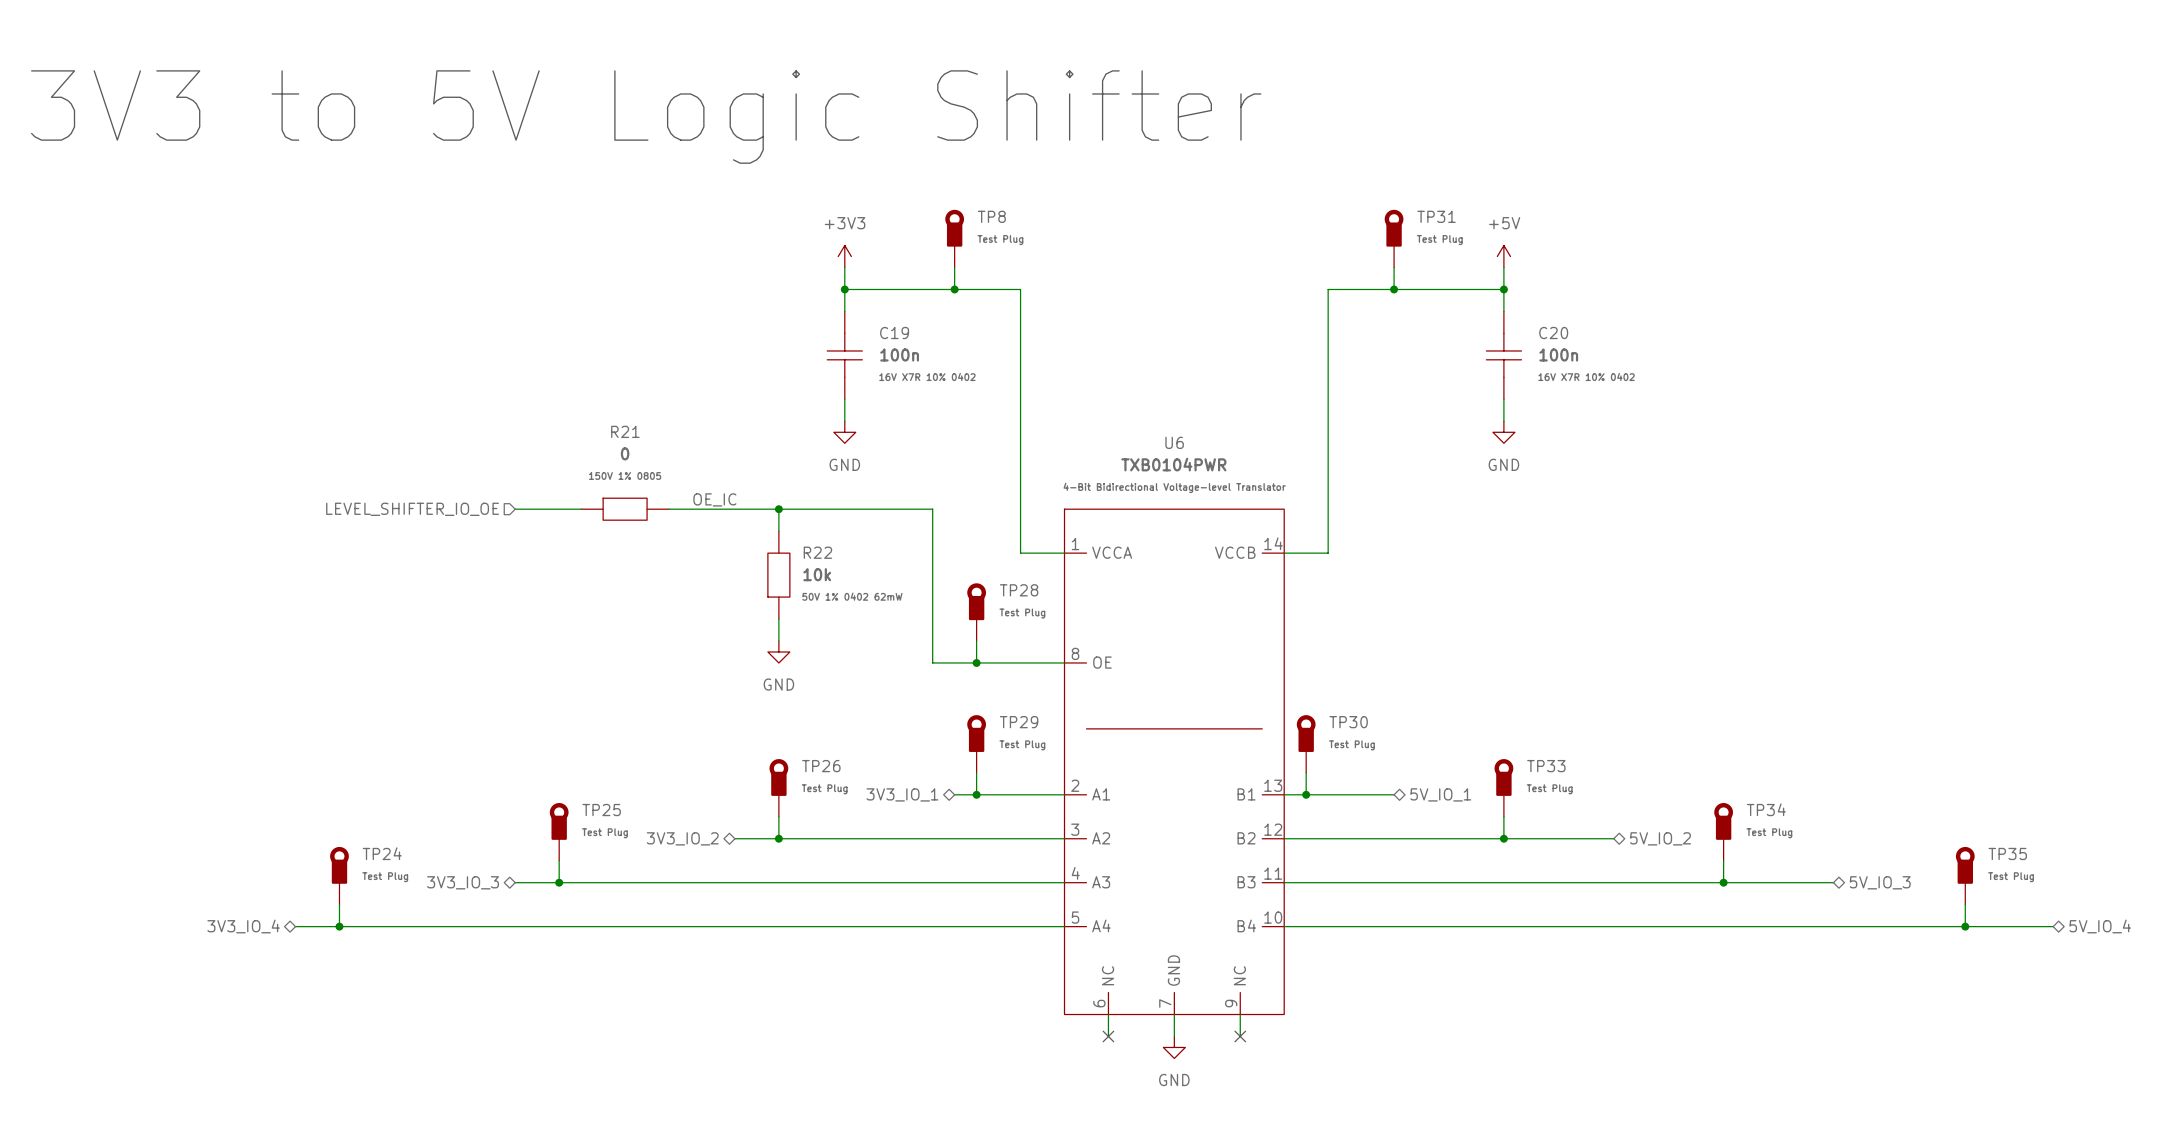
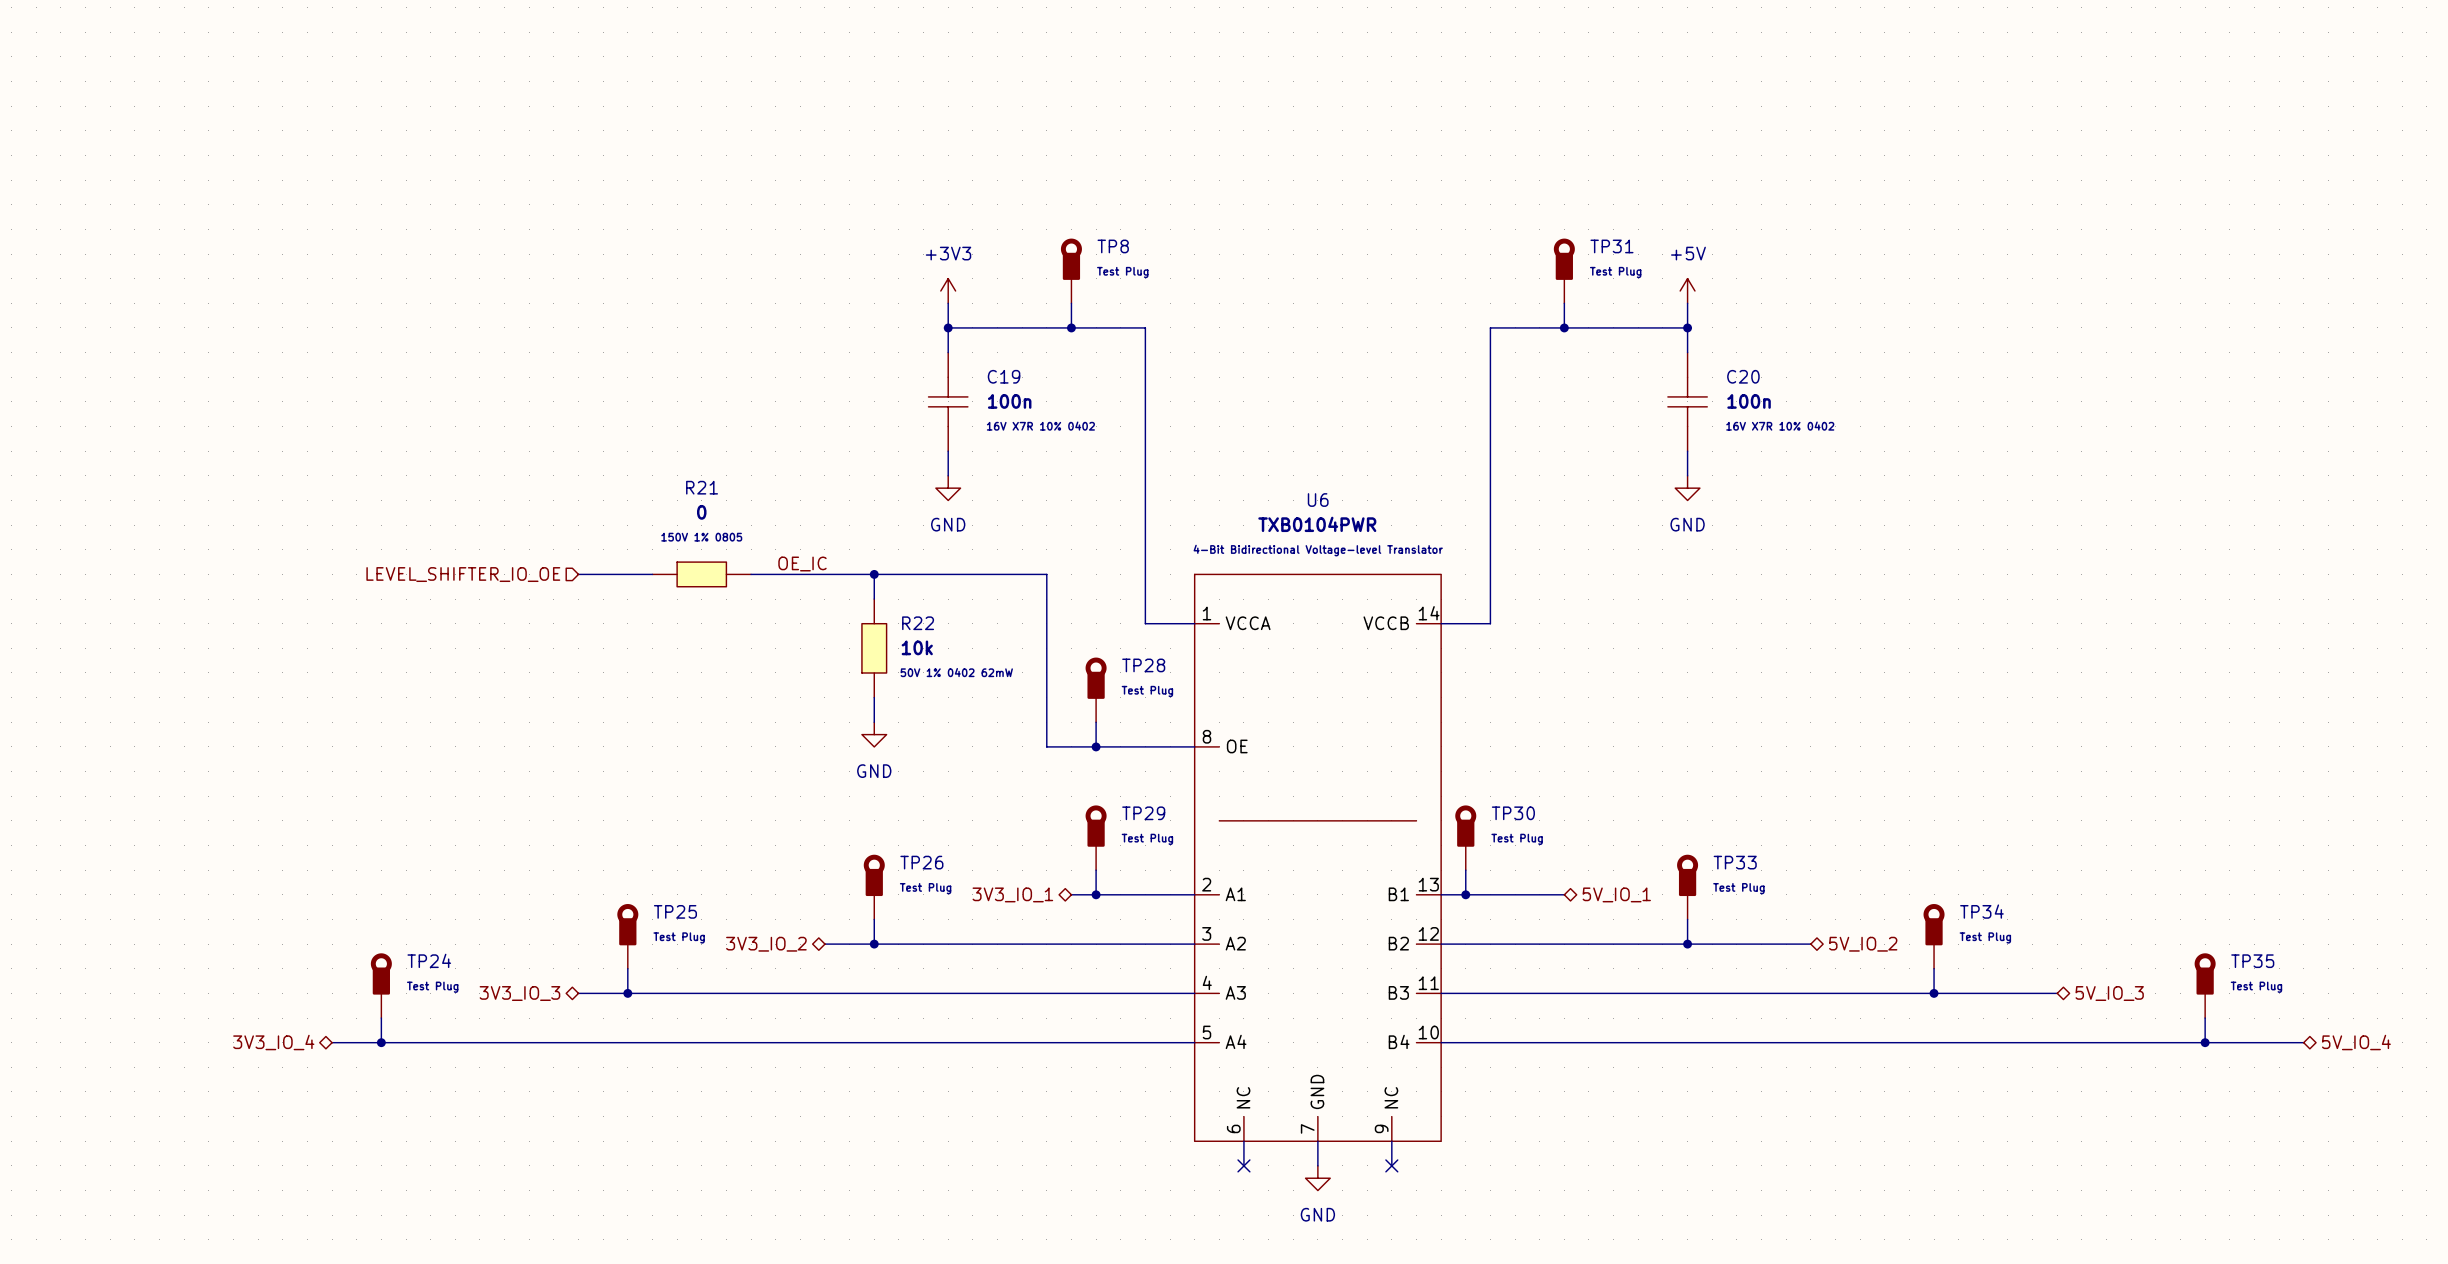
text: 3V3 to 5V Logic Shifter (646, 117) -> none

